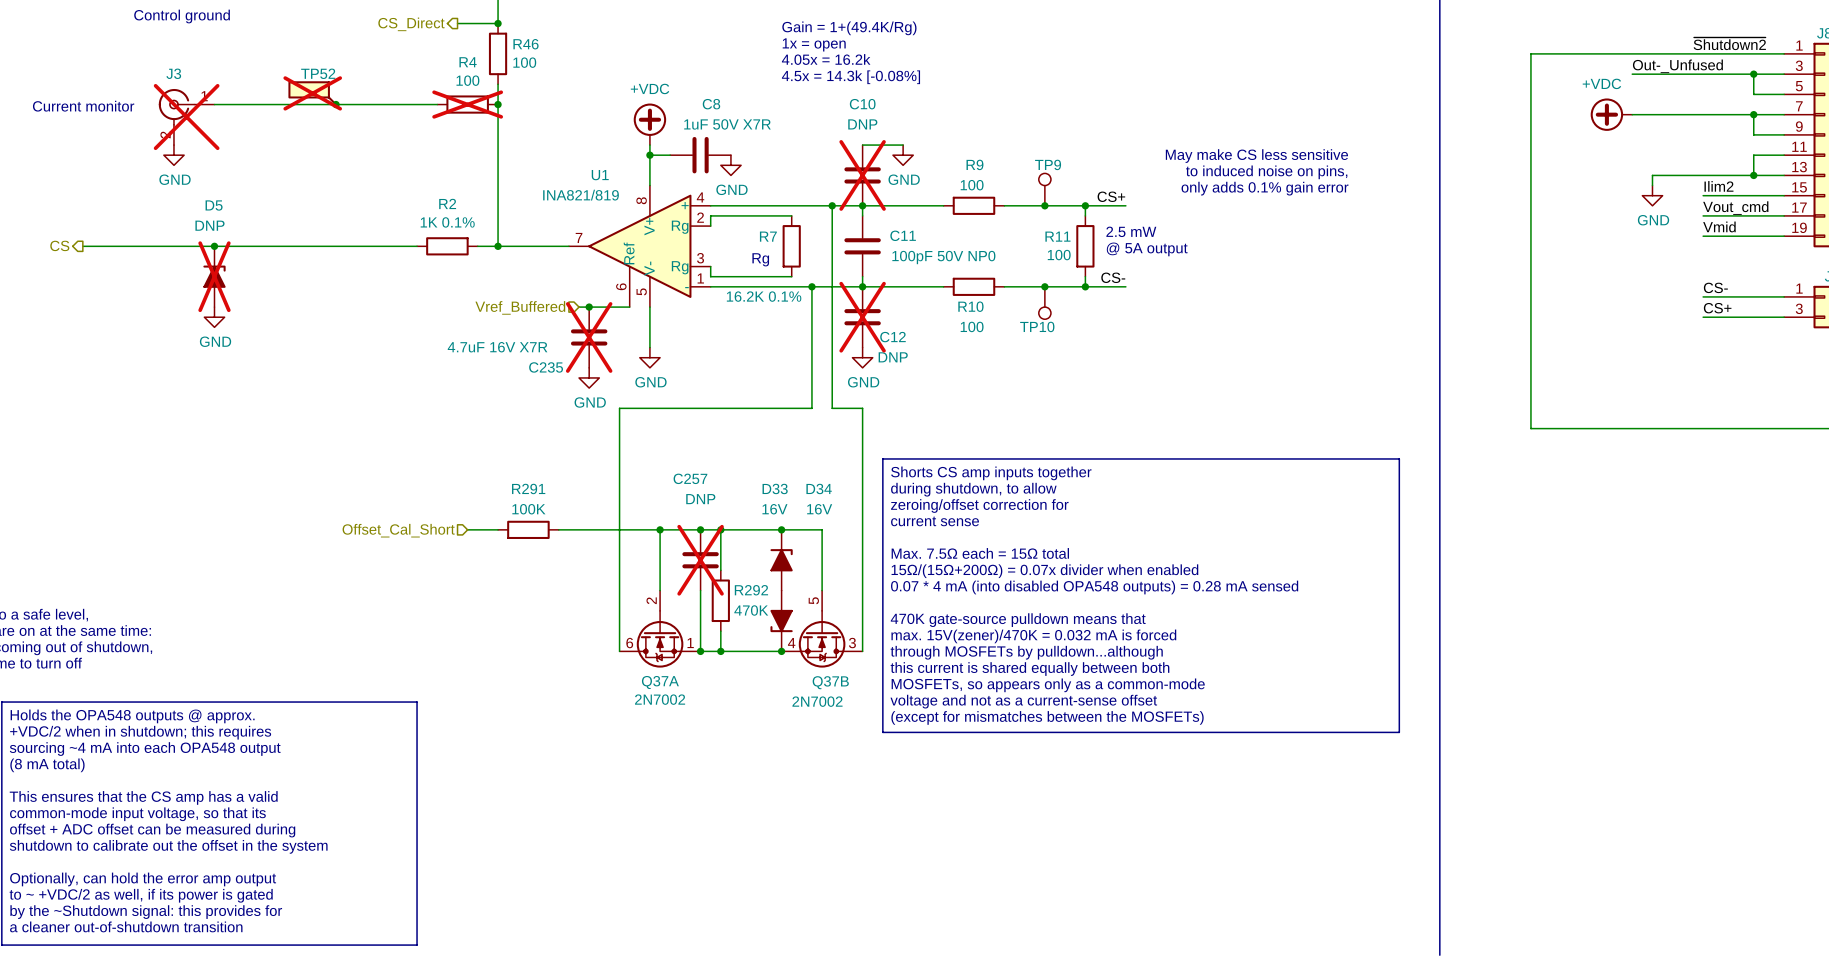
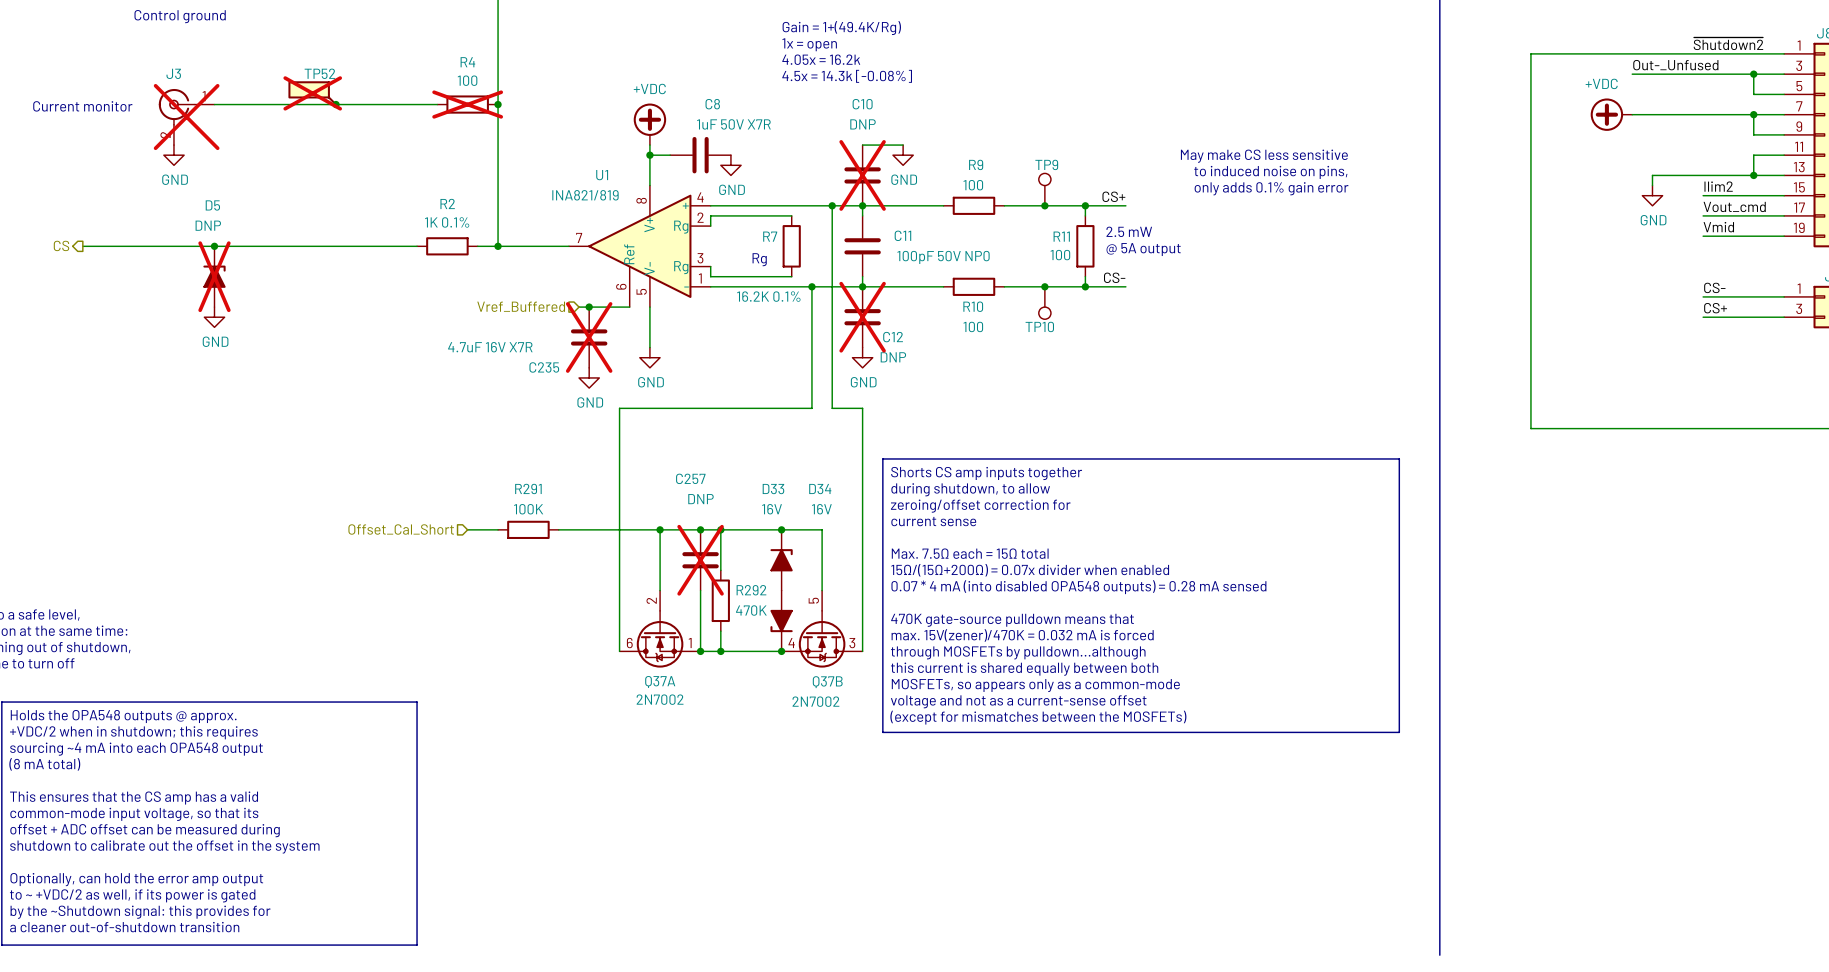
wire: (457, 23) (498, 23) -> (498, 84) (498, 23)
junction: (498, 23) -> none
hierarchical label: CS_Direct (411, 24) -> none
R46: 100 (498, 53) -> none

